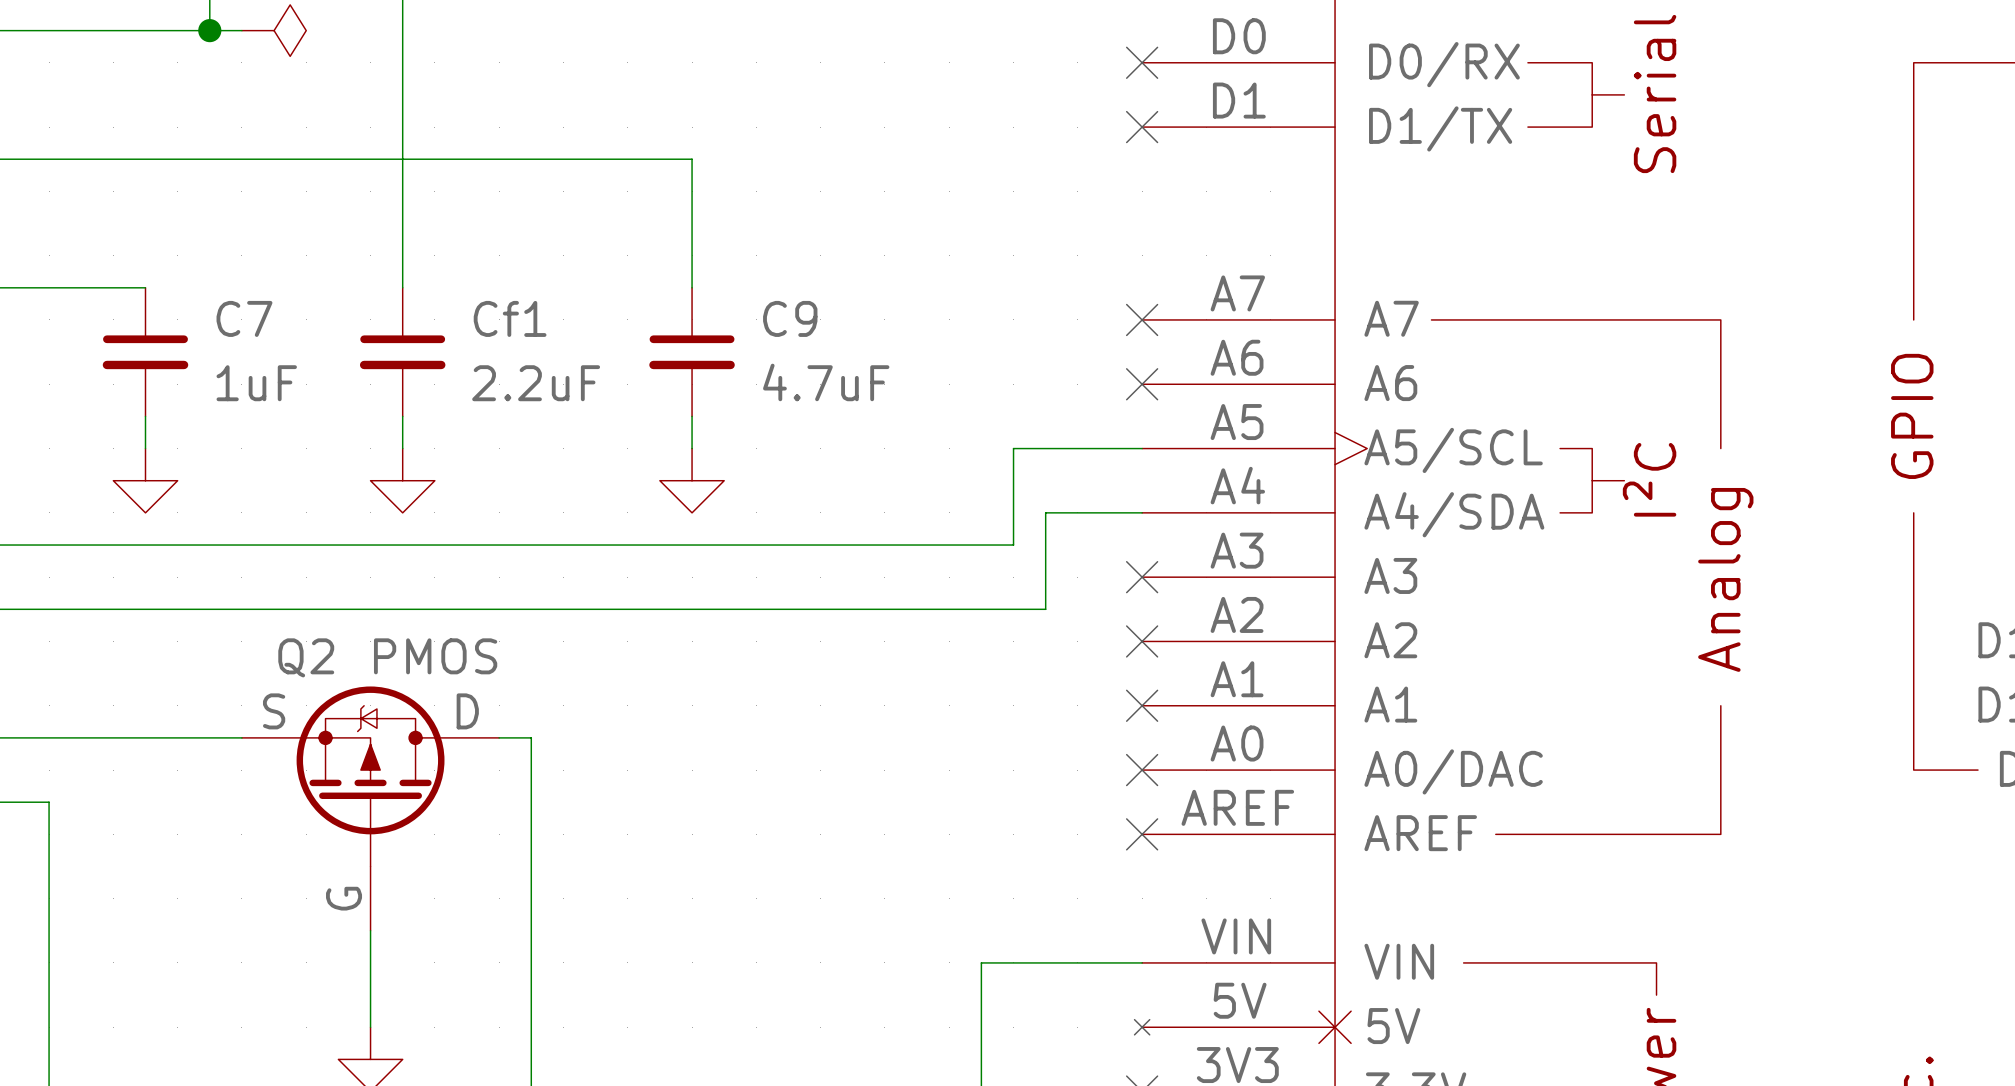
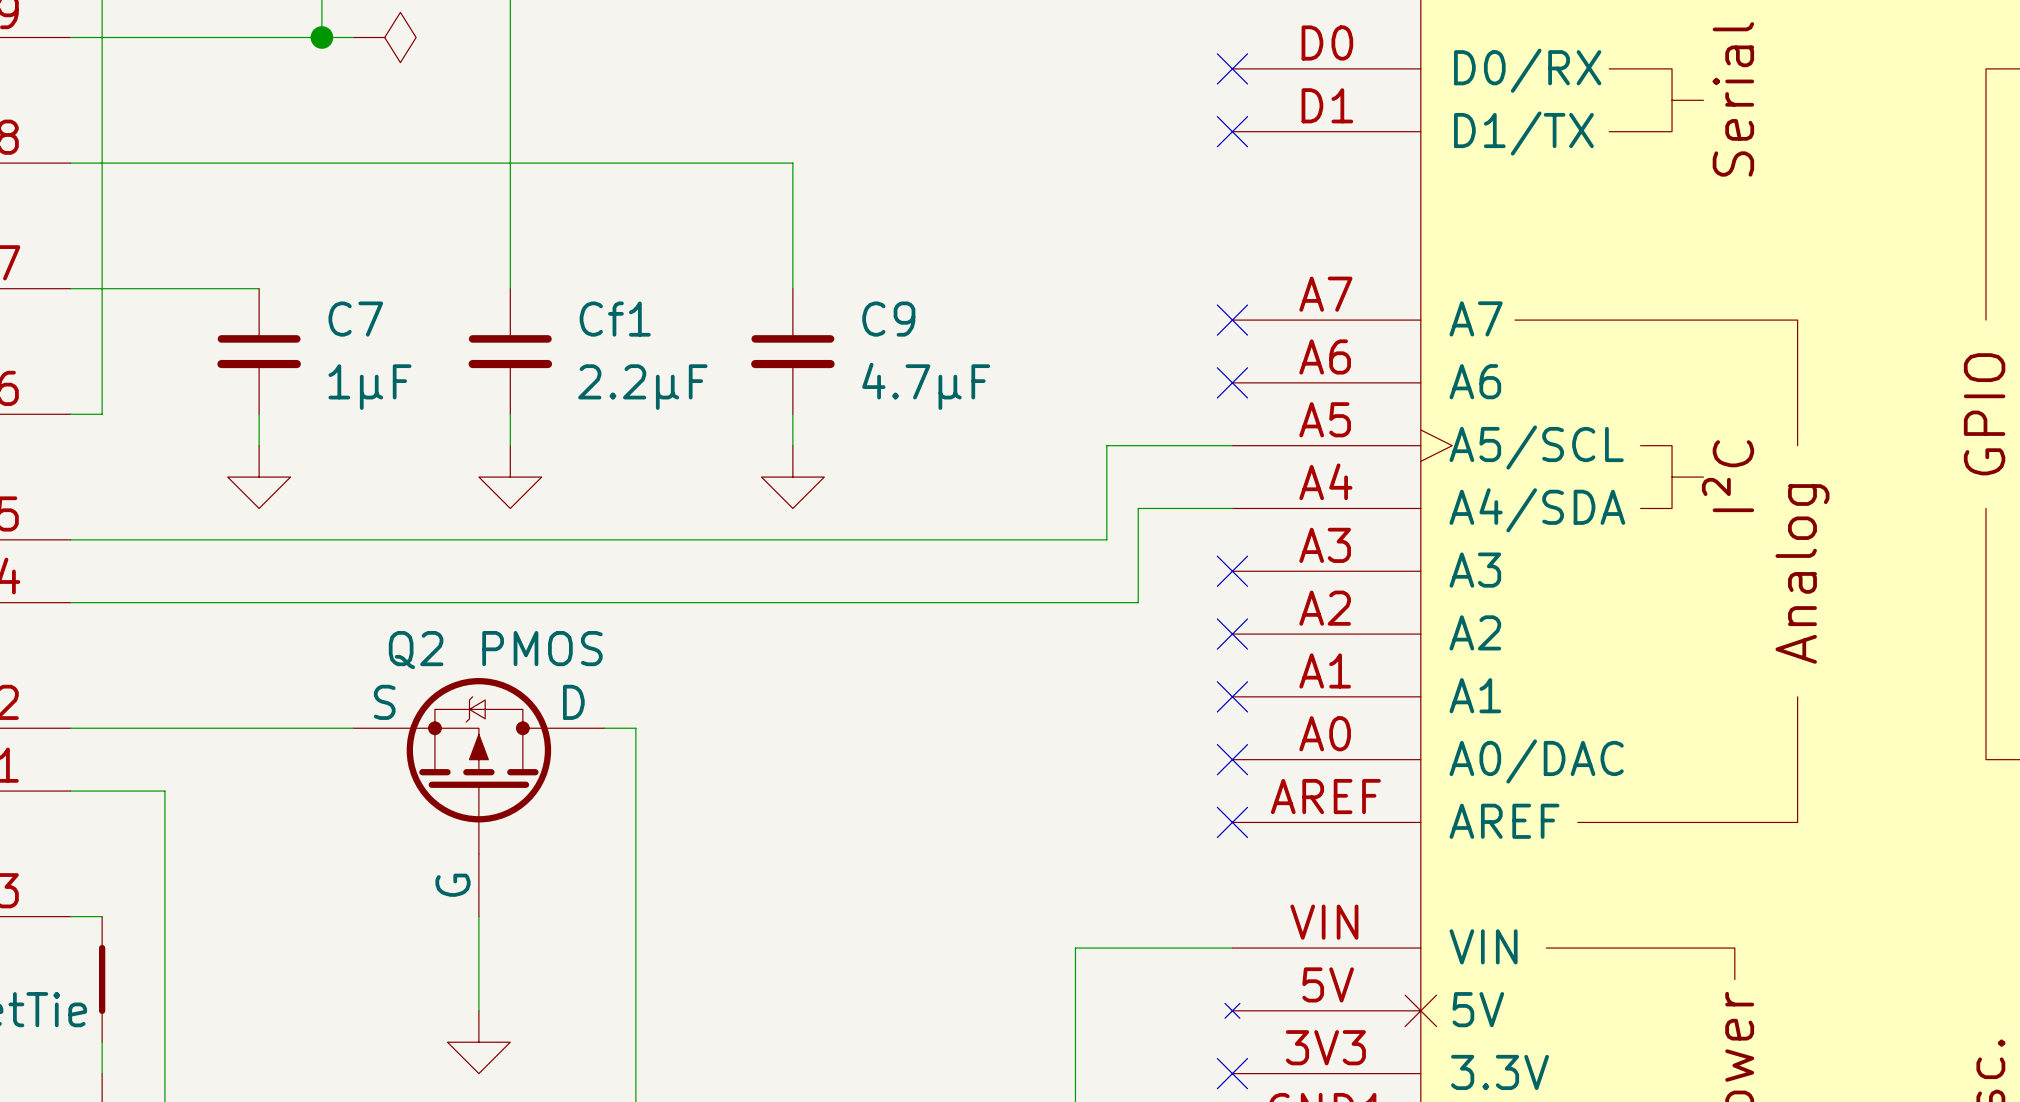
C9 value: 4.7uF (826, 382) -> 4.7μF (926, 386)
C7 value: 1uF (256, 383) -> 1μF (369, 387)
Cf1 value: 2.2uF (536, 383) -> 2.2μF (642, 387)

